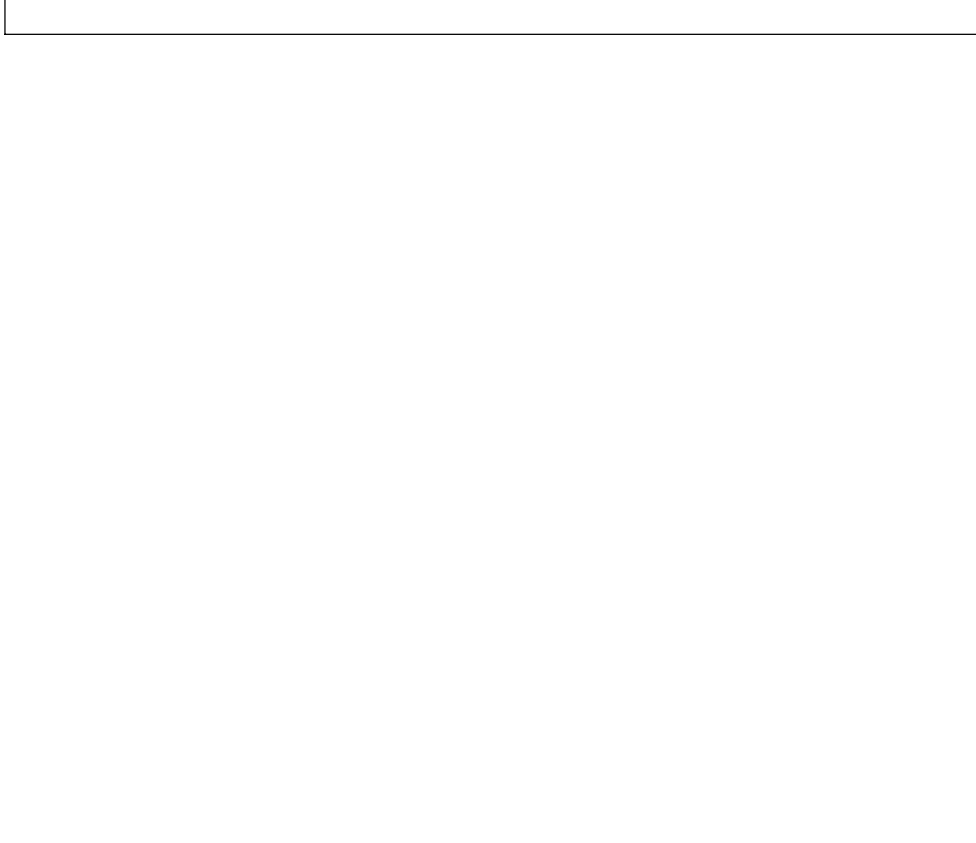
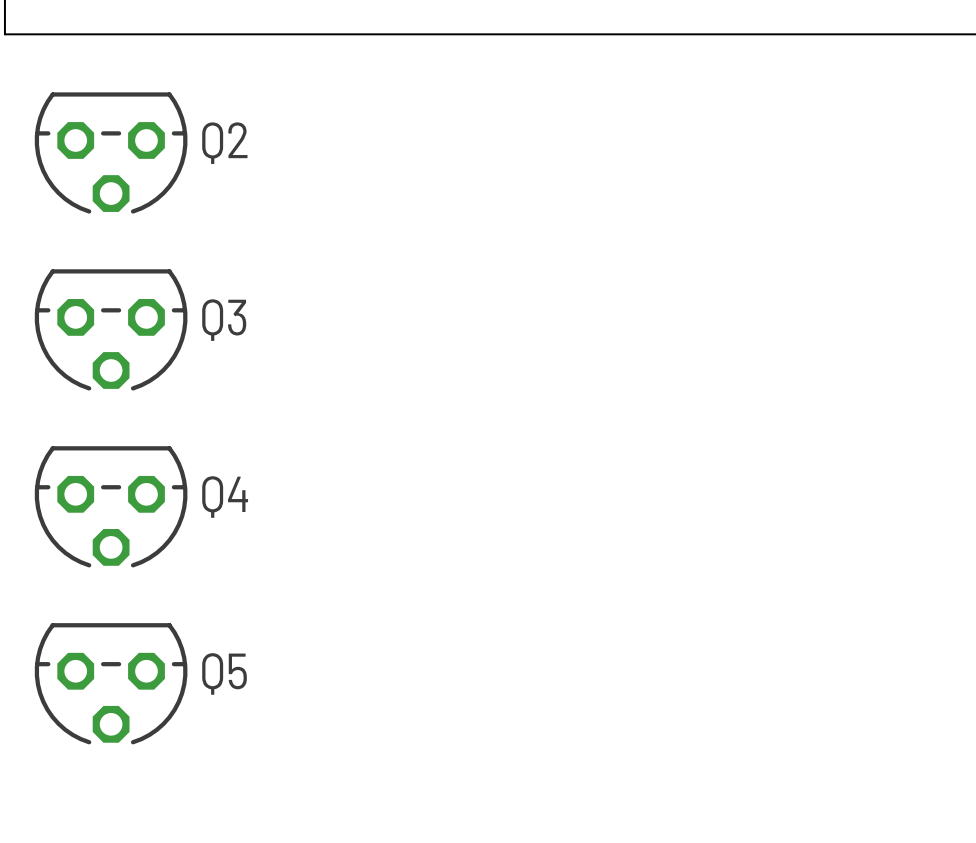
Q2: none -> (111, 152)
Q3: none -> (111, 329)
Q4: none -> (111, 506)
Q5: none -> (111, 683)

